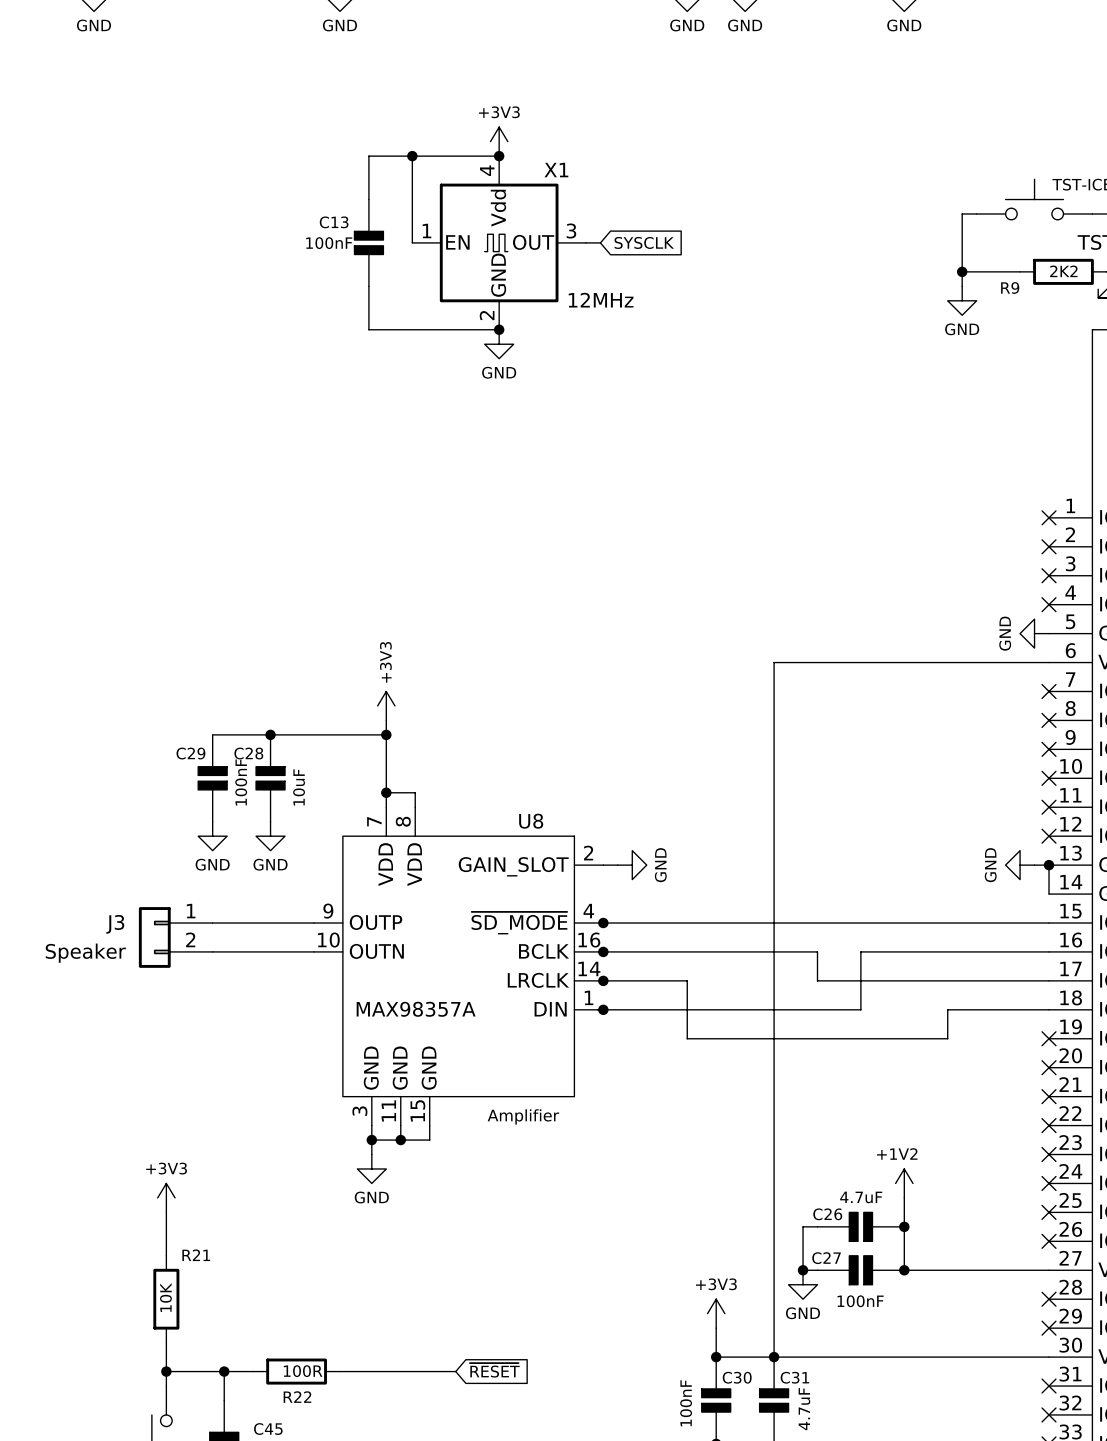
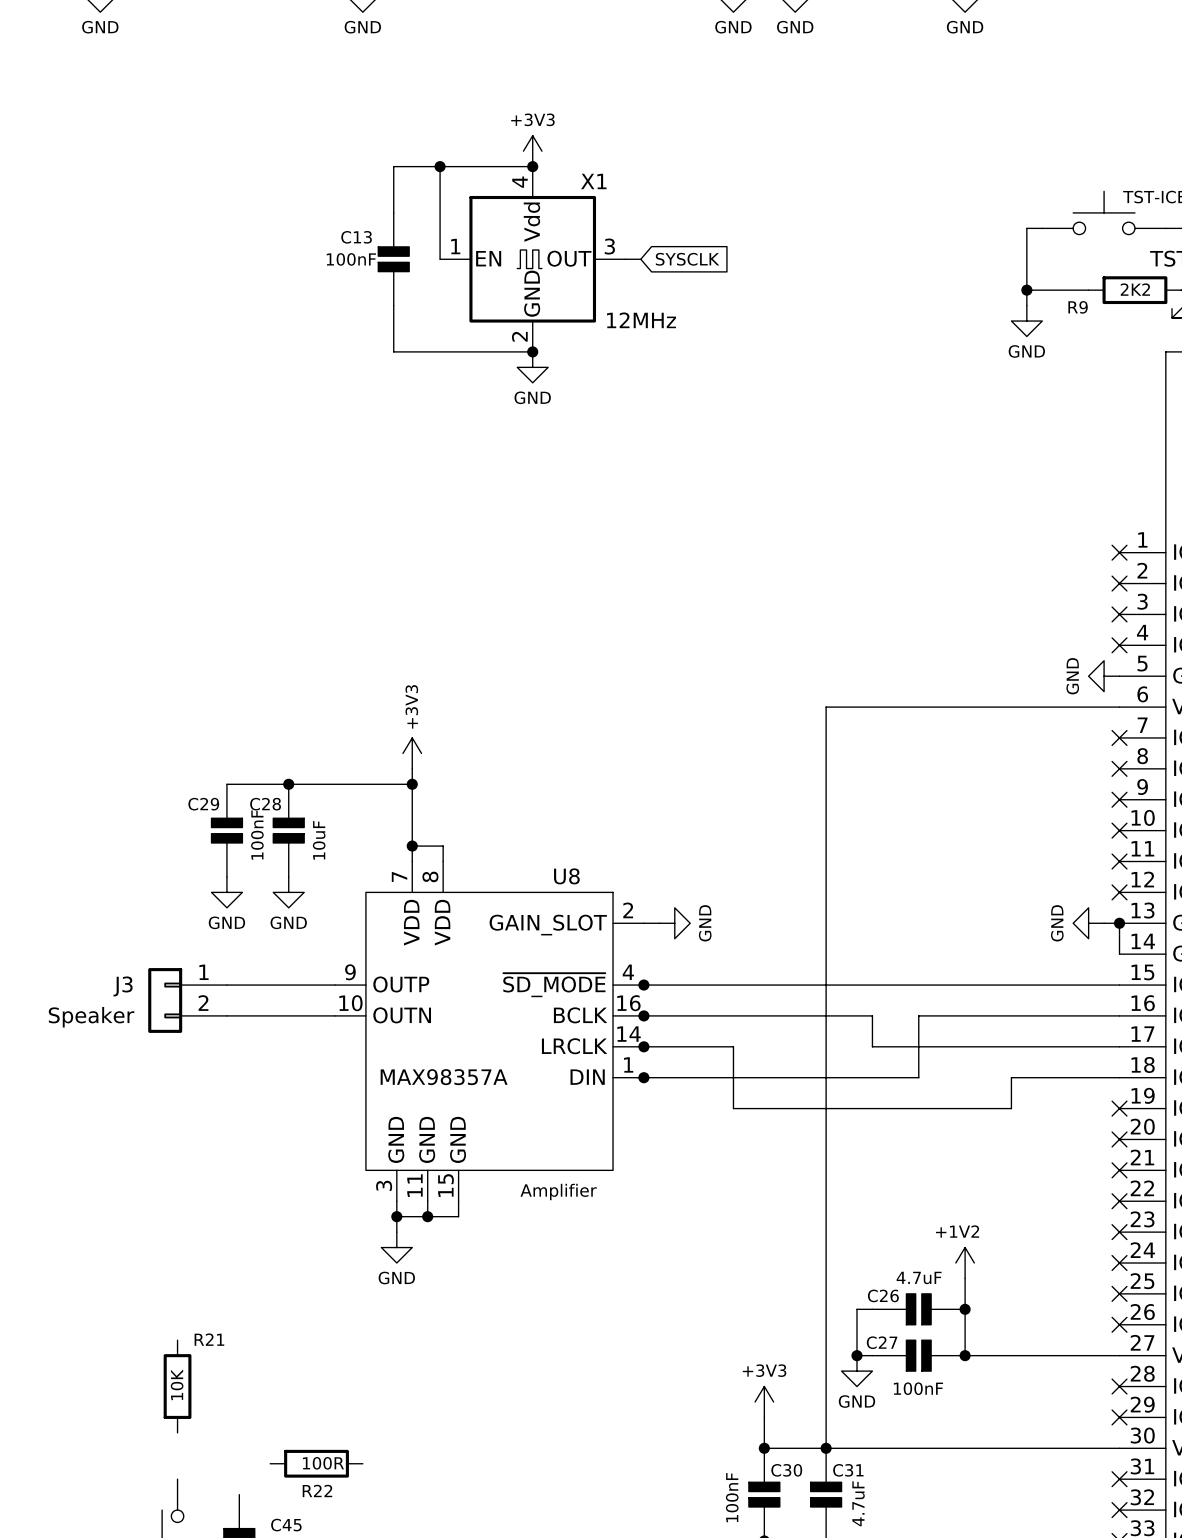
power symbol: +3V3 (166, 1197) -> none
wire: (166, 1212) (166, 1255) -> none
wire: (166, 1342) (166, 1386) -> none
global label: ~{RESET} (494, 1370) -> none
wire: (166, 1371) (253, 1371) -> none
junction: (166, 1371) -> none
wire: (224, 1371) (224, 1400) -> none
junction: (224, 1371) -> none
wire: (340, 1371) (455, 1371) -> none

